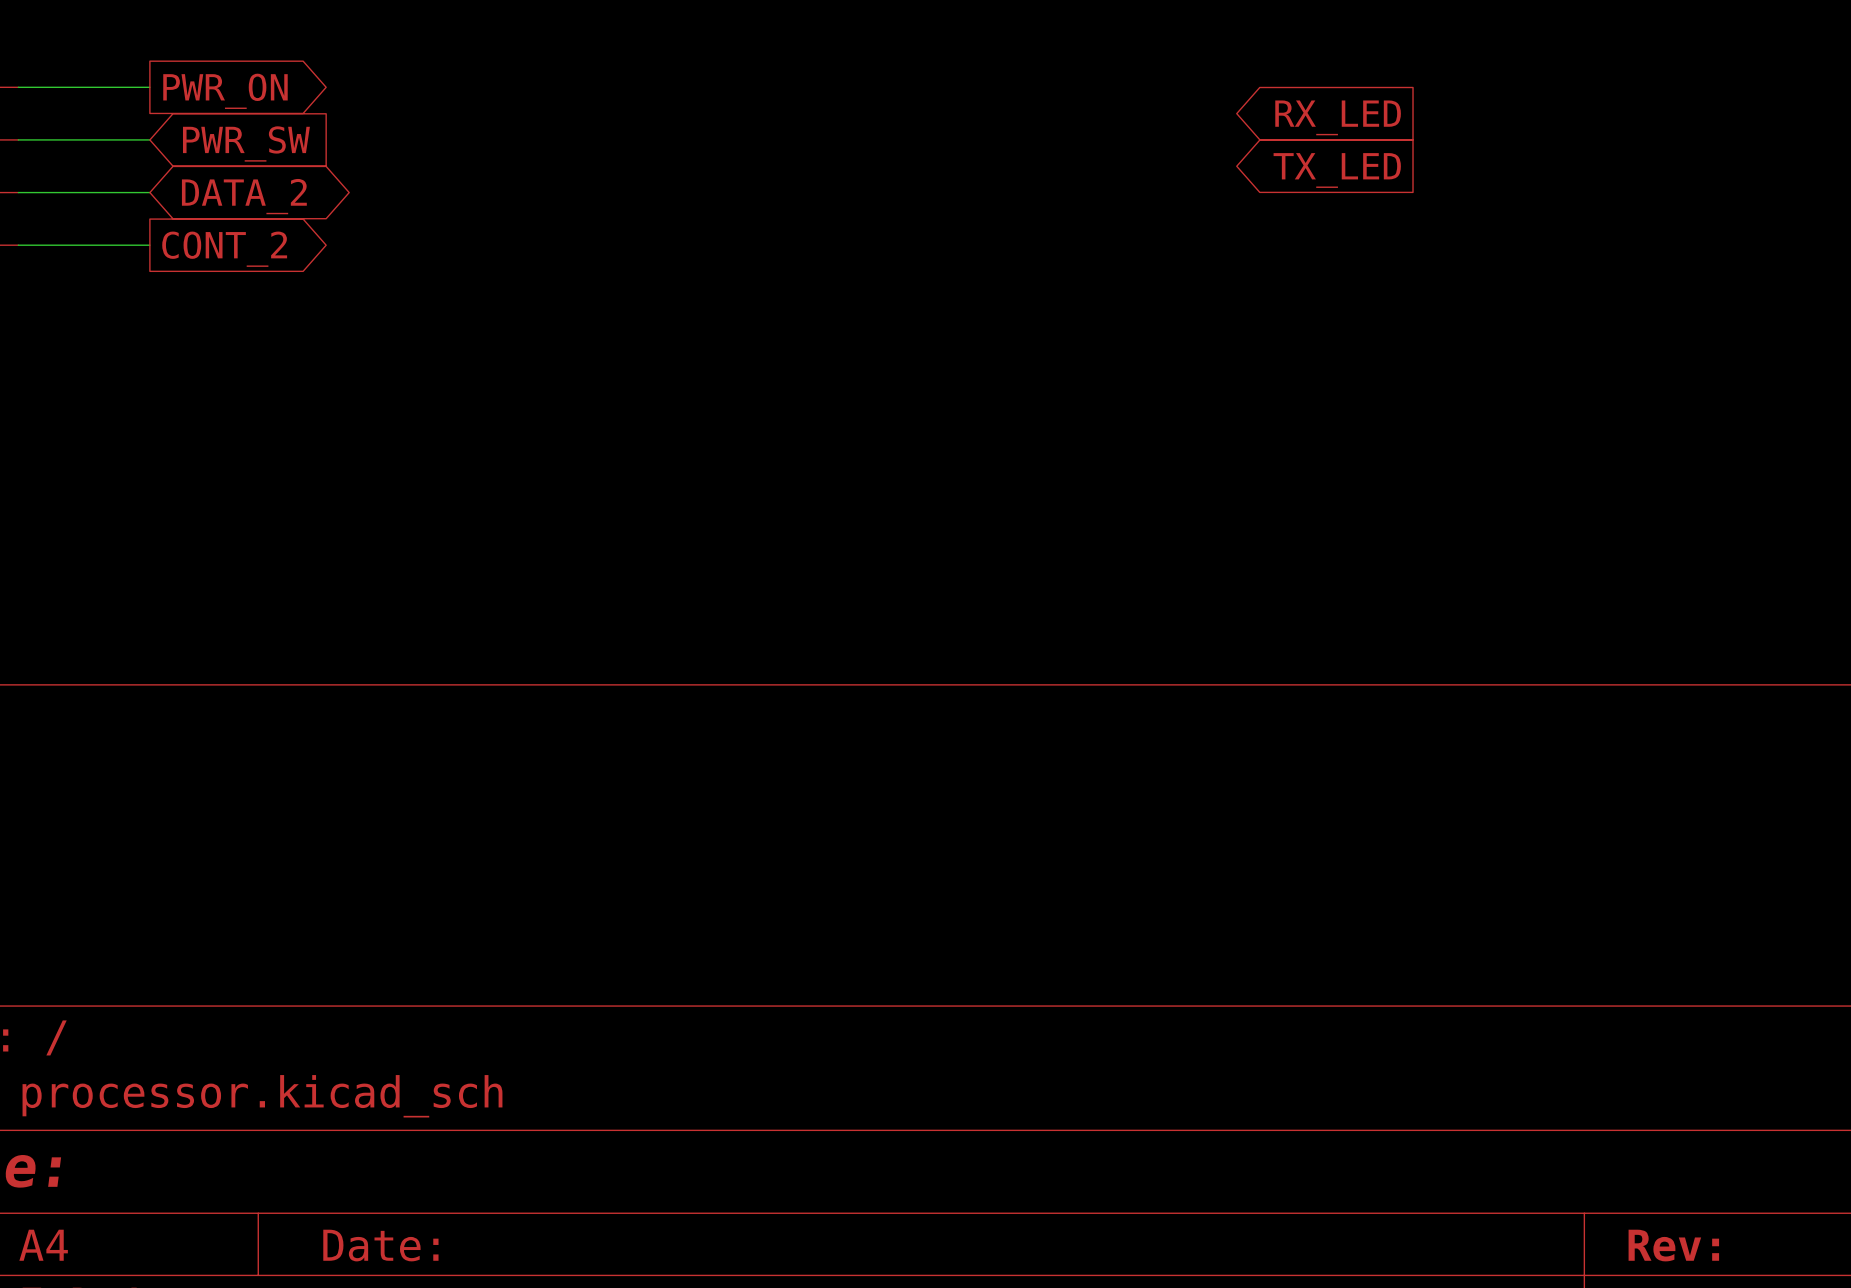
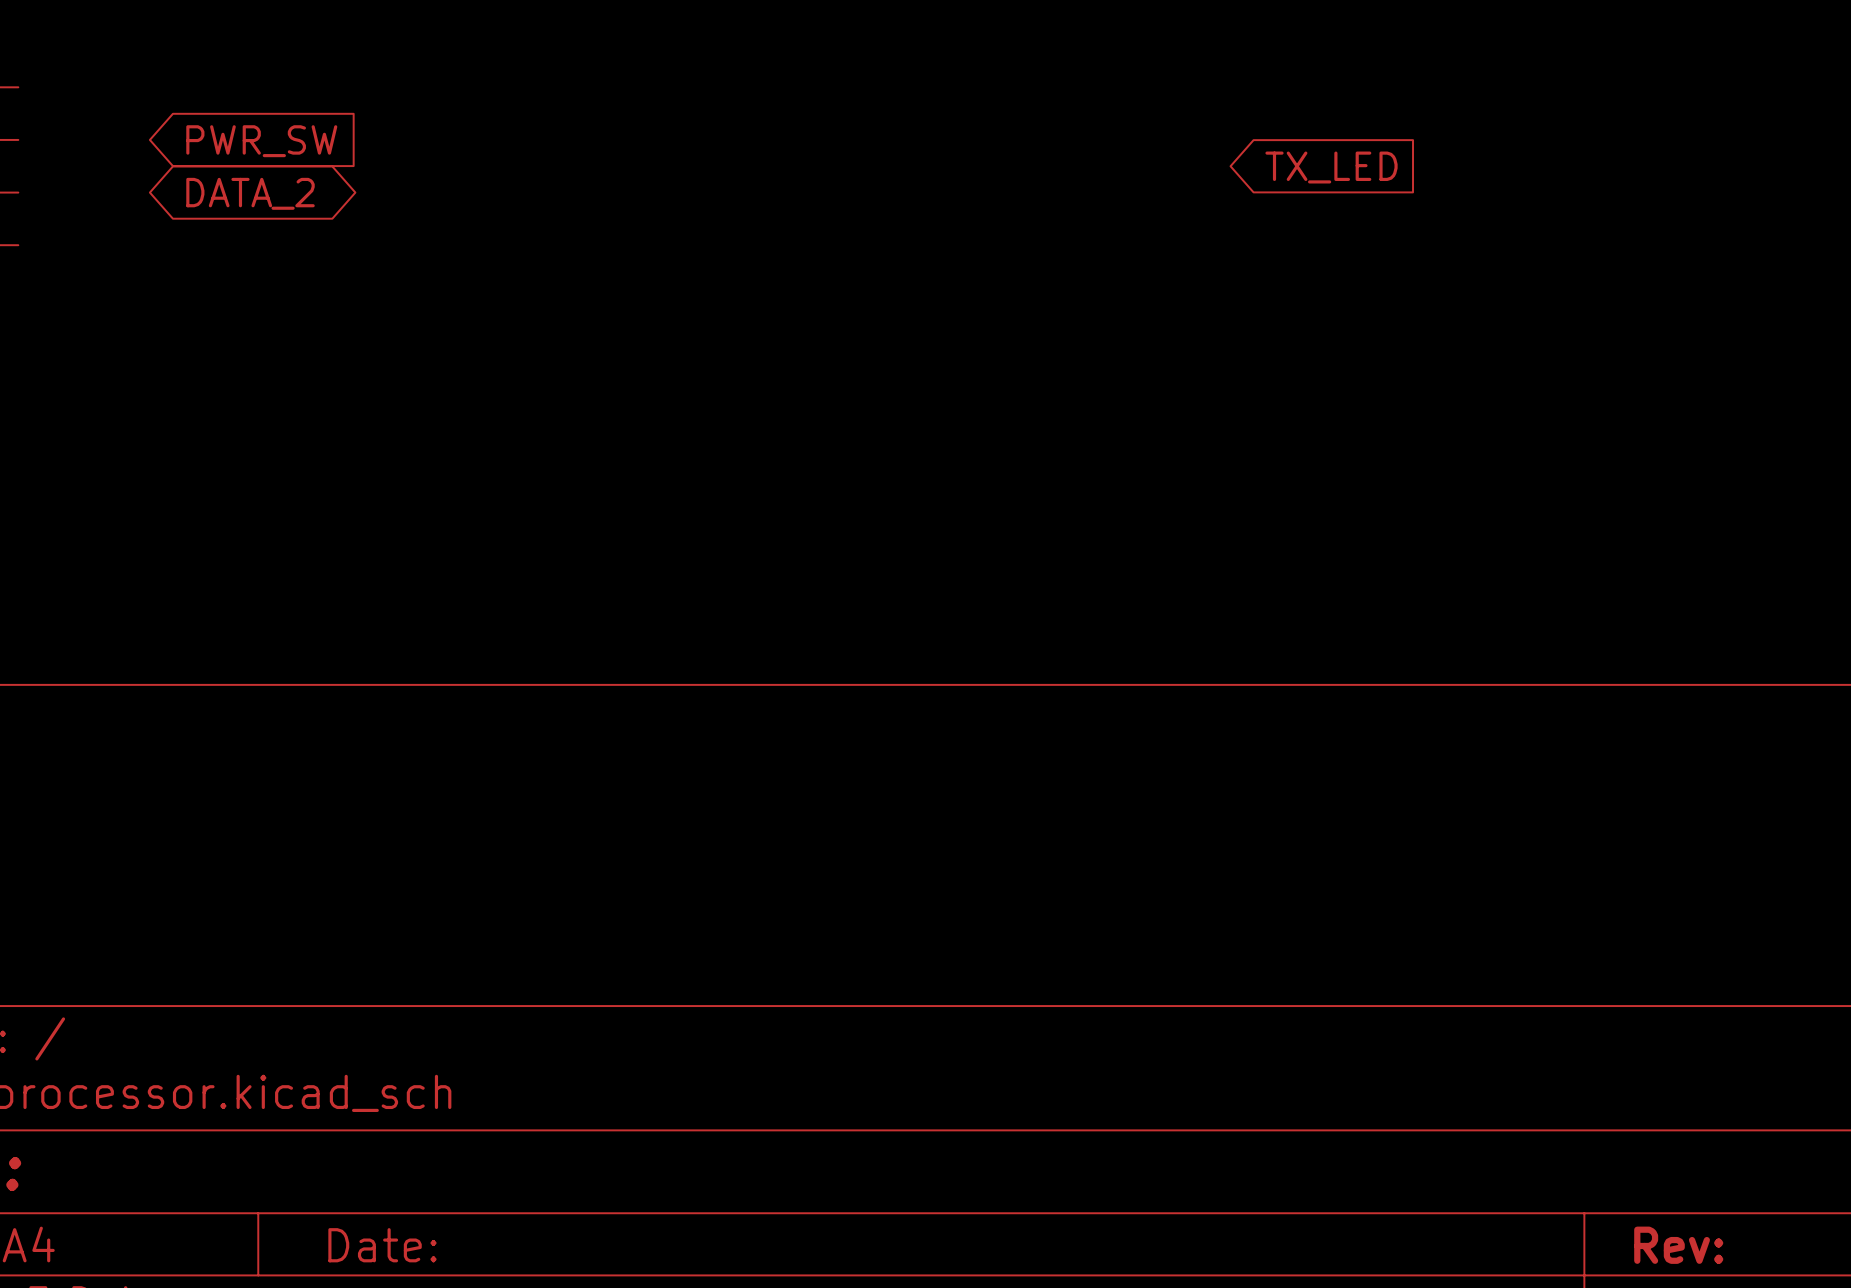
wire: (18, 87) (149, 87) -> none
global label: PWR_ON (225, 91) -> none
global label: RX_LED (1338, 117) -> none
wire: (18, 139) (149, 139) -> none
wire: (18, 192) (149, 192) -> none
wire: (18, 245) (149, 245) -> none
global label: CONT_2 (224, 249) -> none

